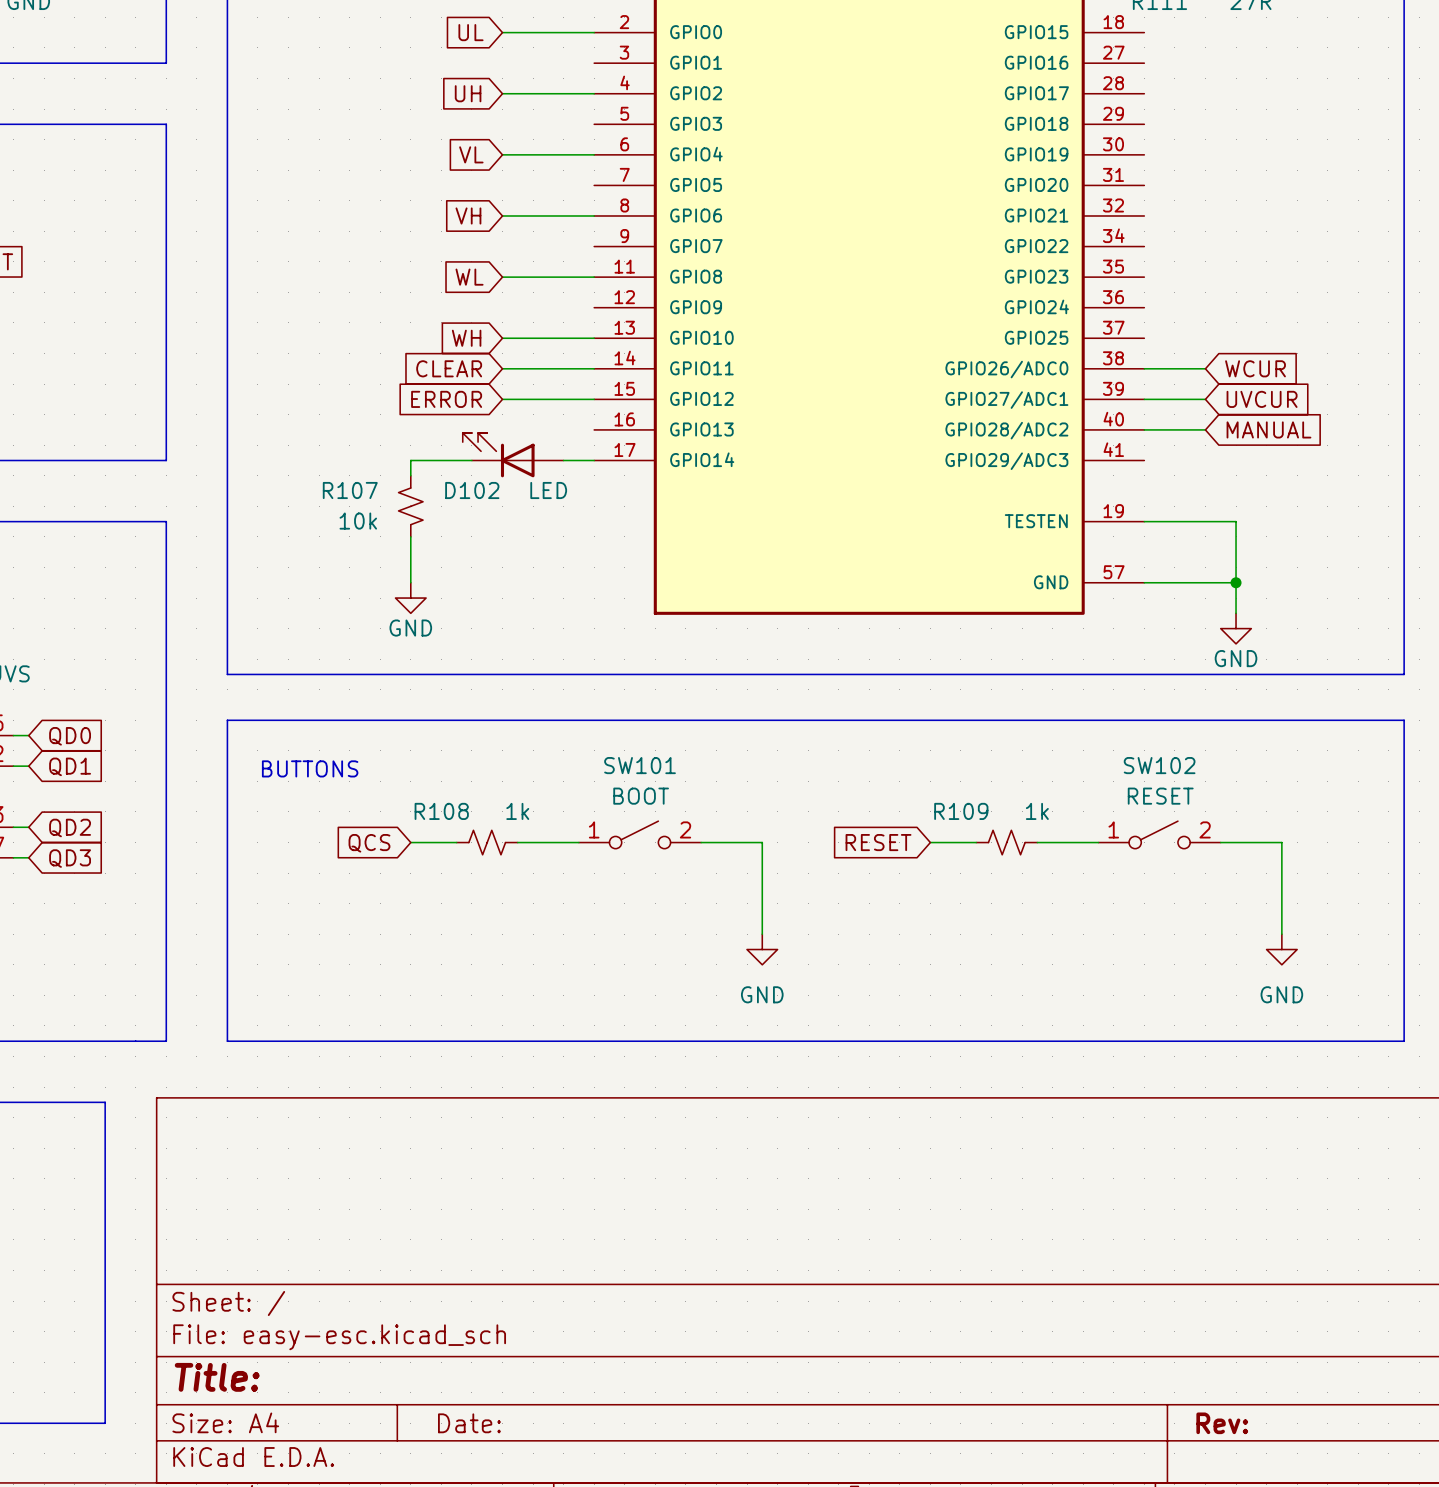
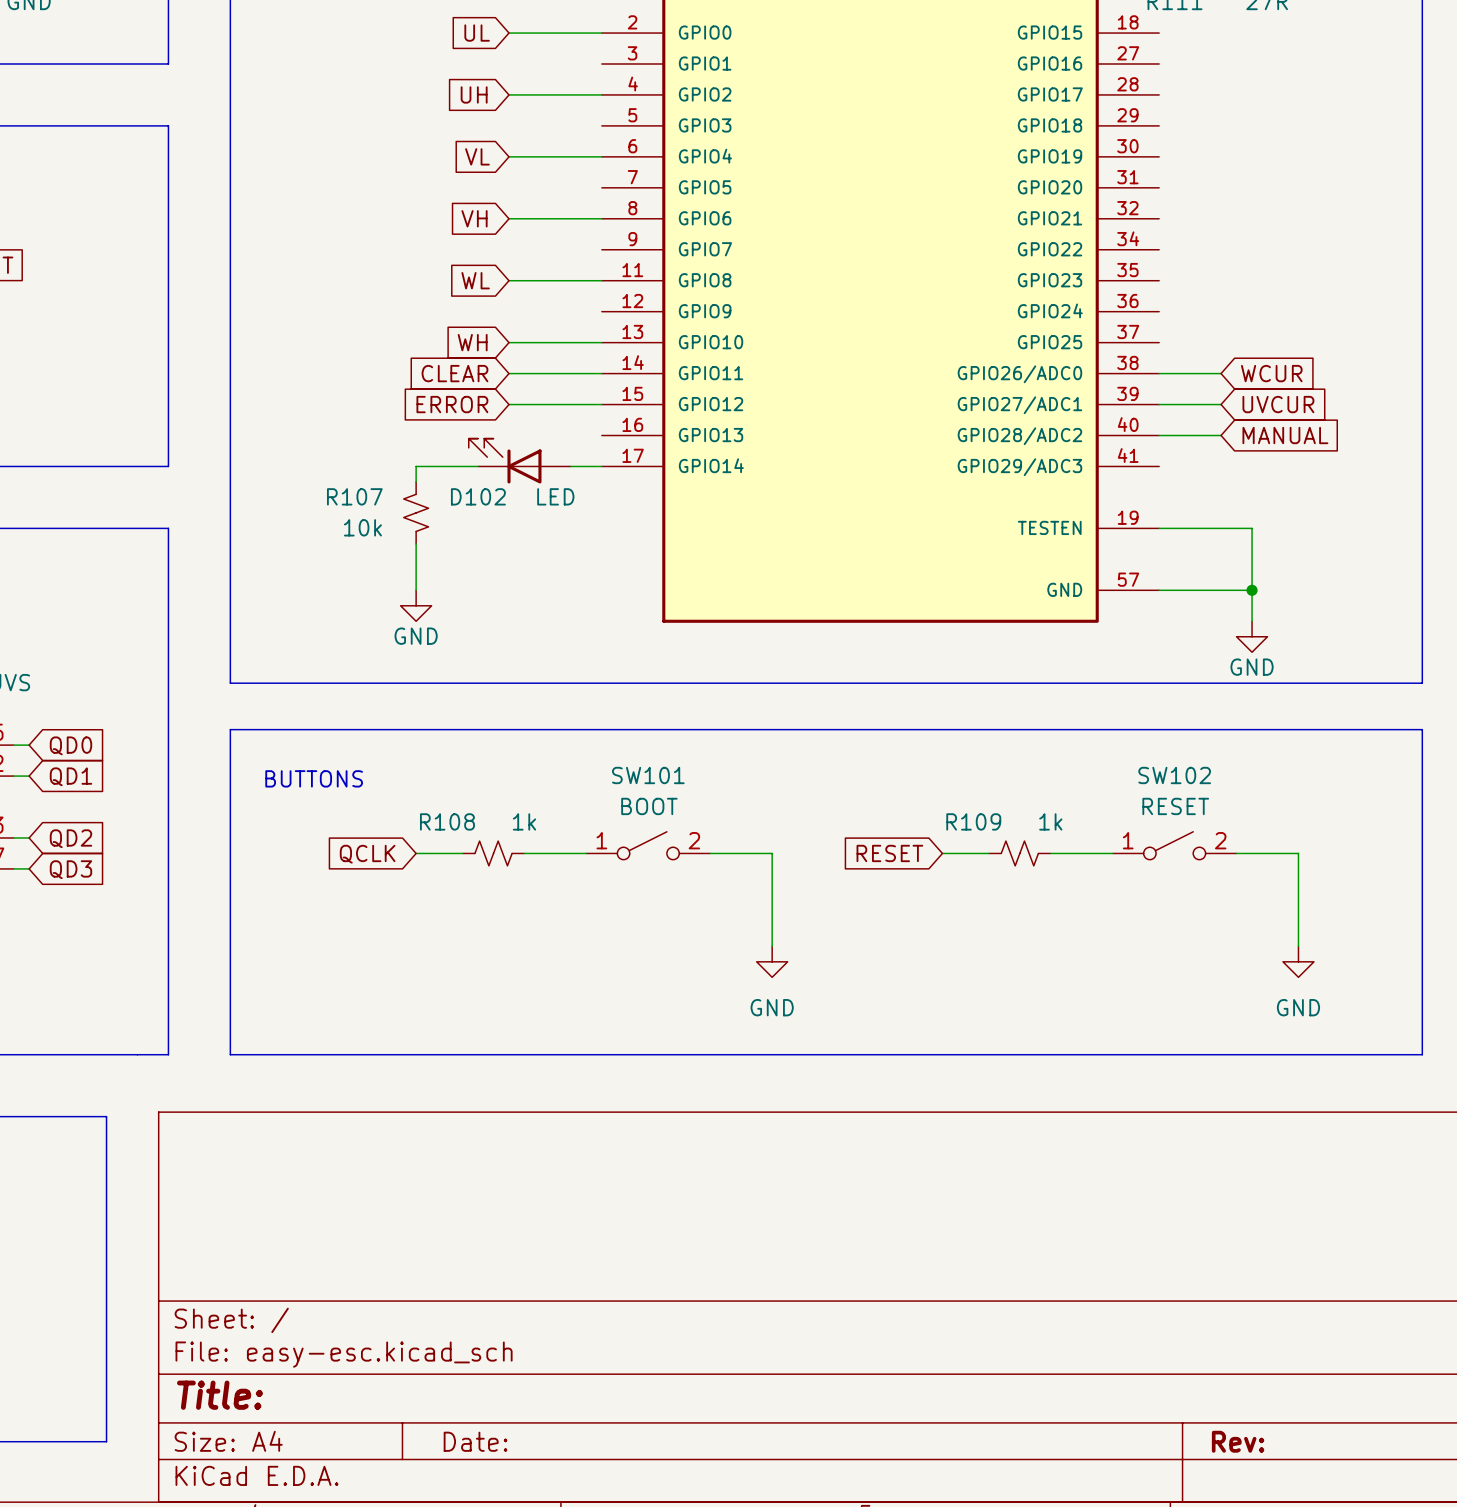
global label: QCS (369, 843) -> QCLK (367, 854)

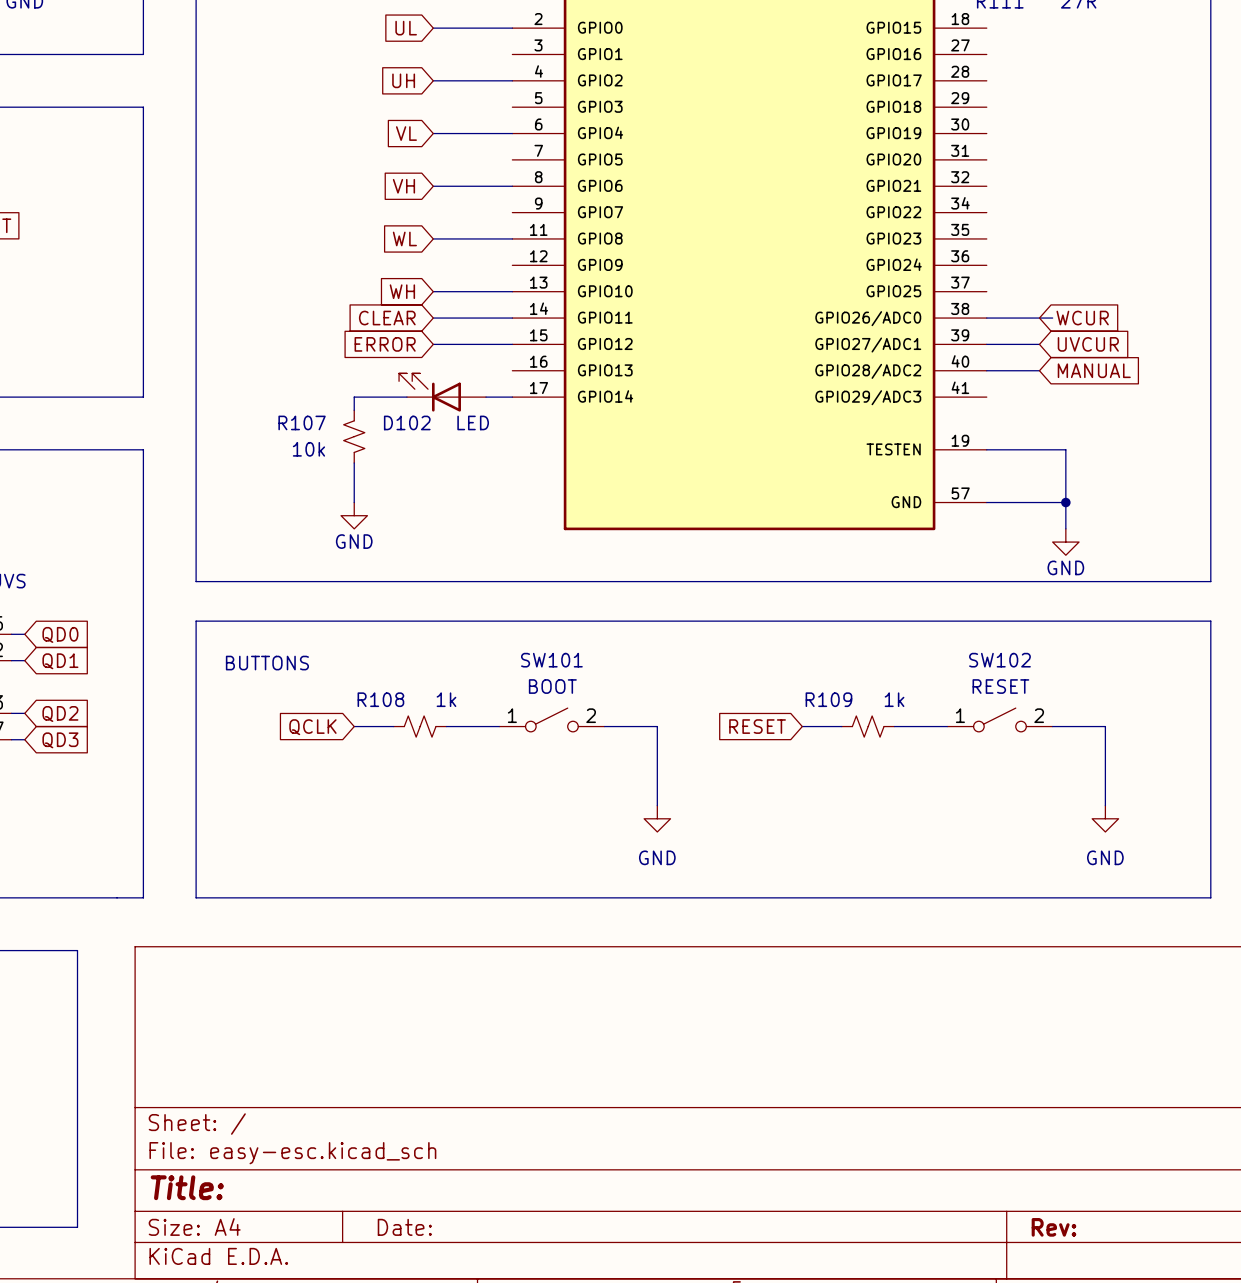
wire: none -> (1039, 318) (1052, 318)
line: (91, 1116) (106, 1116) (106, 1441) (91, 1441) -> (77, 950) (77, 1227)

